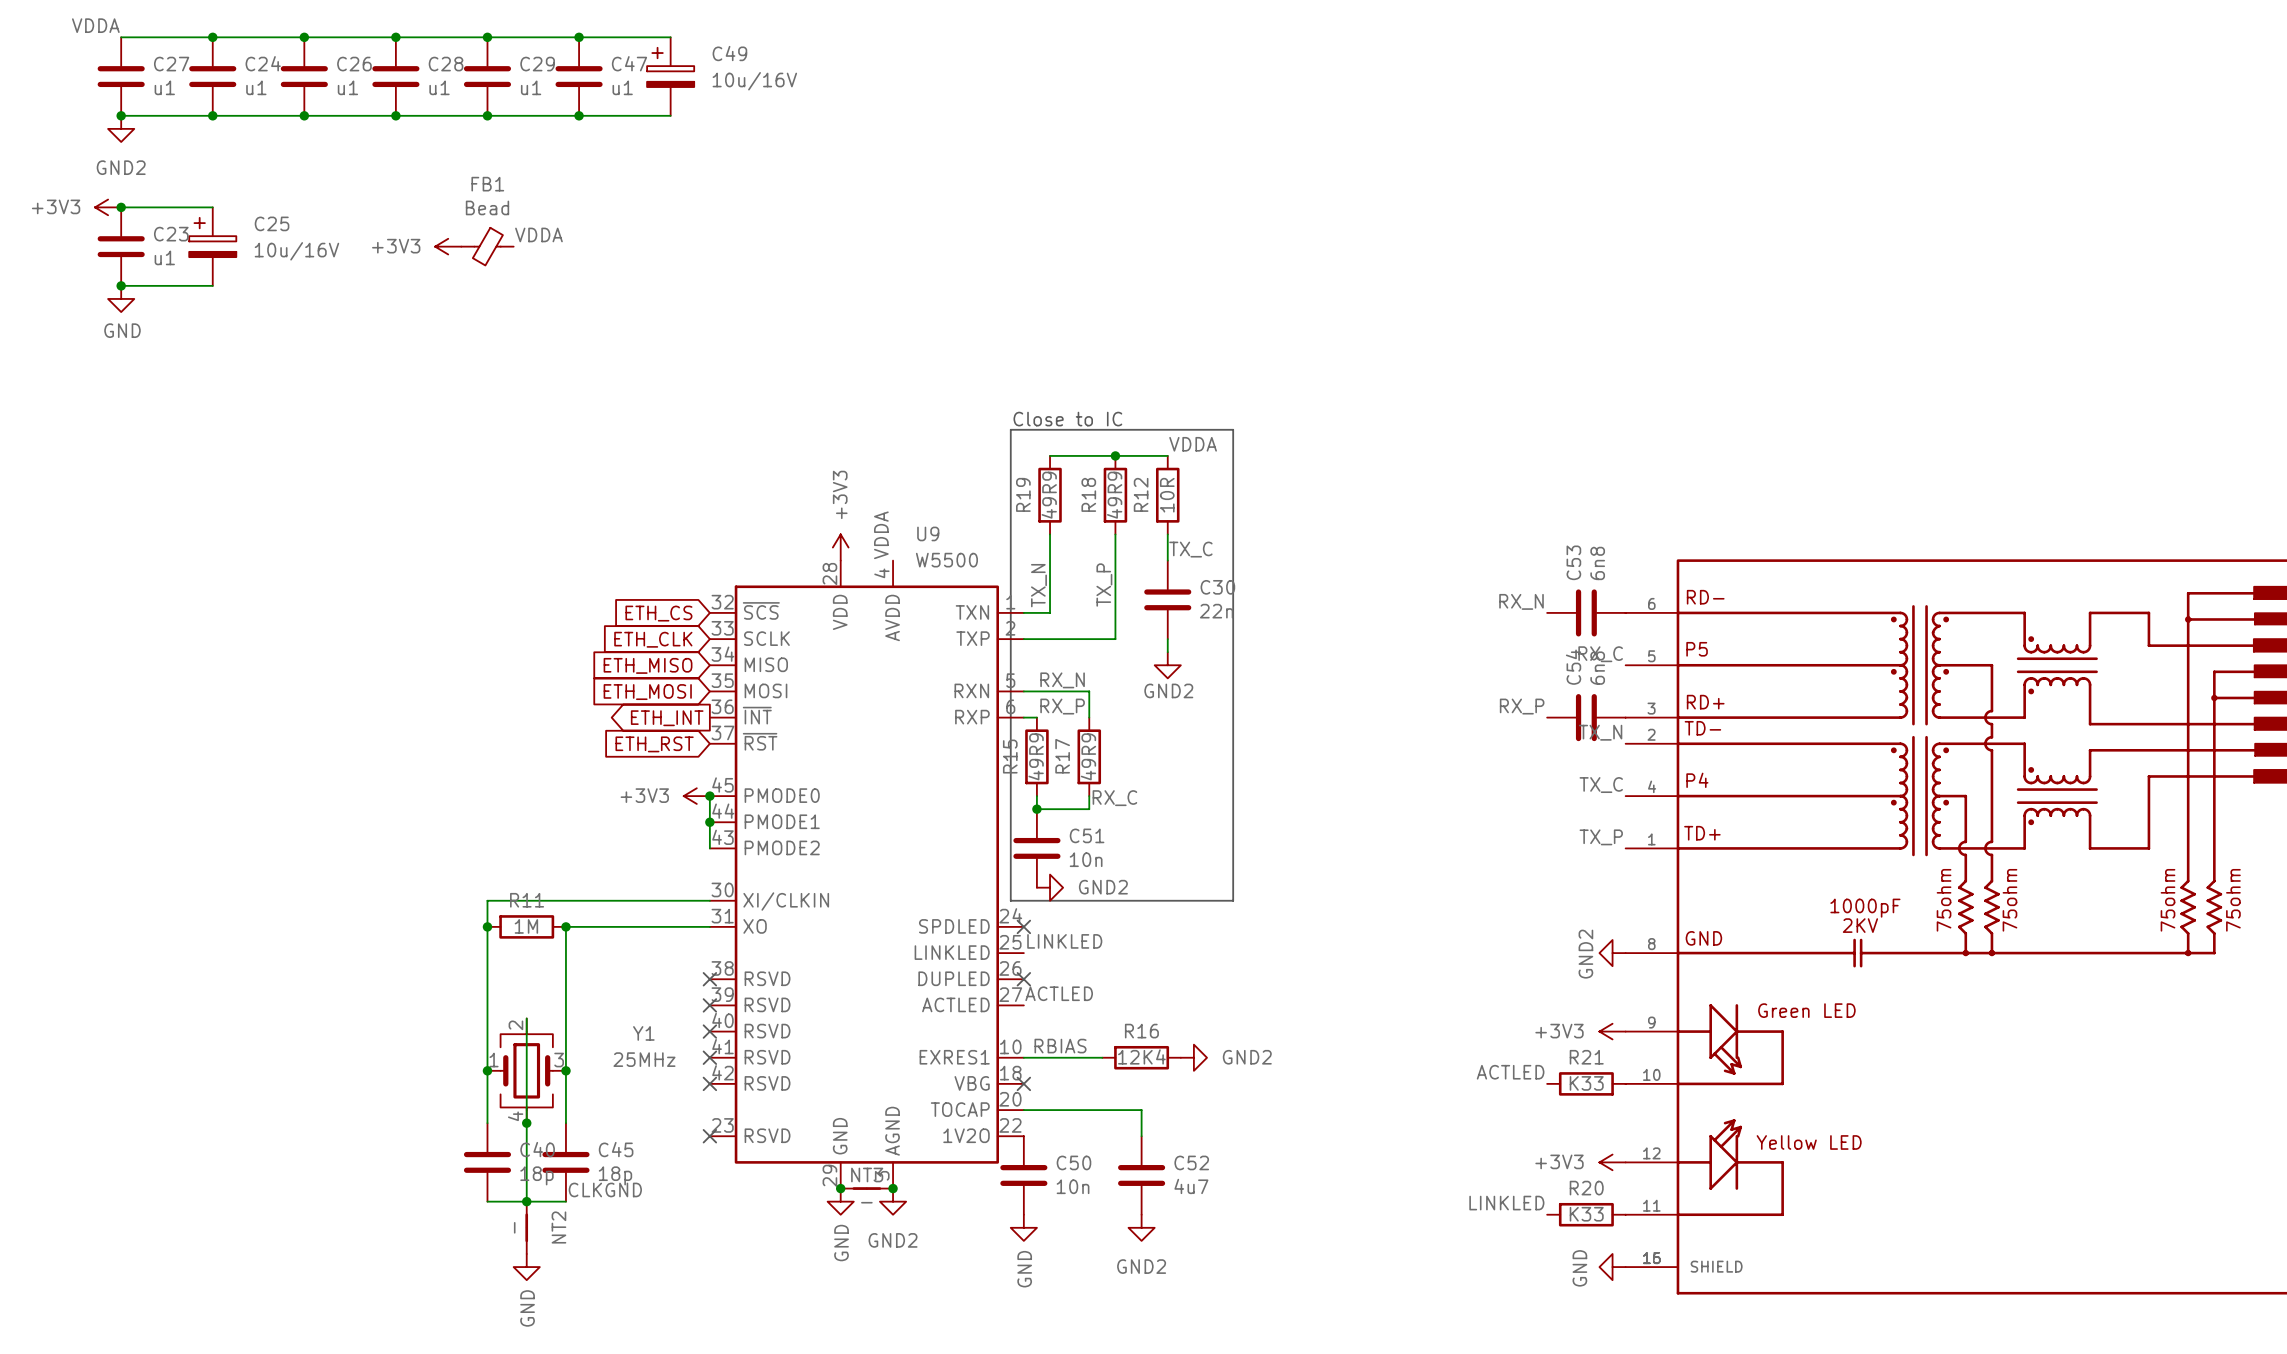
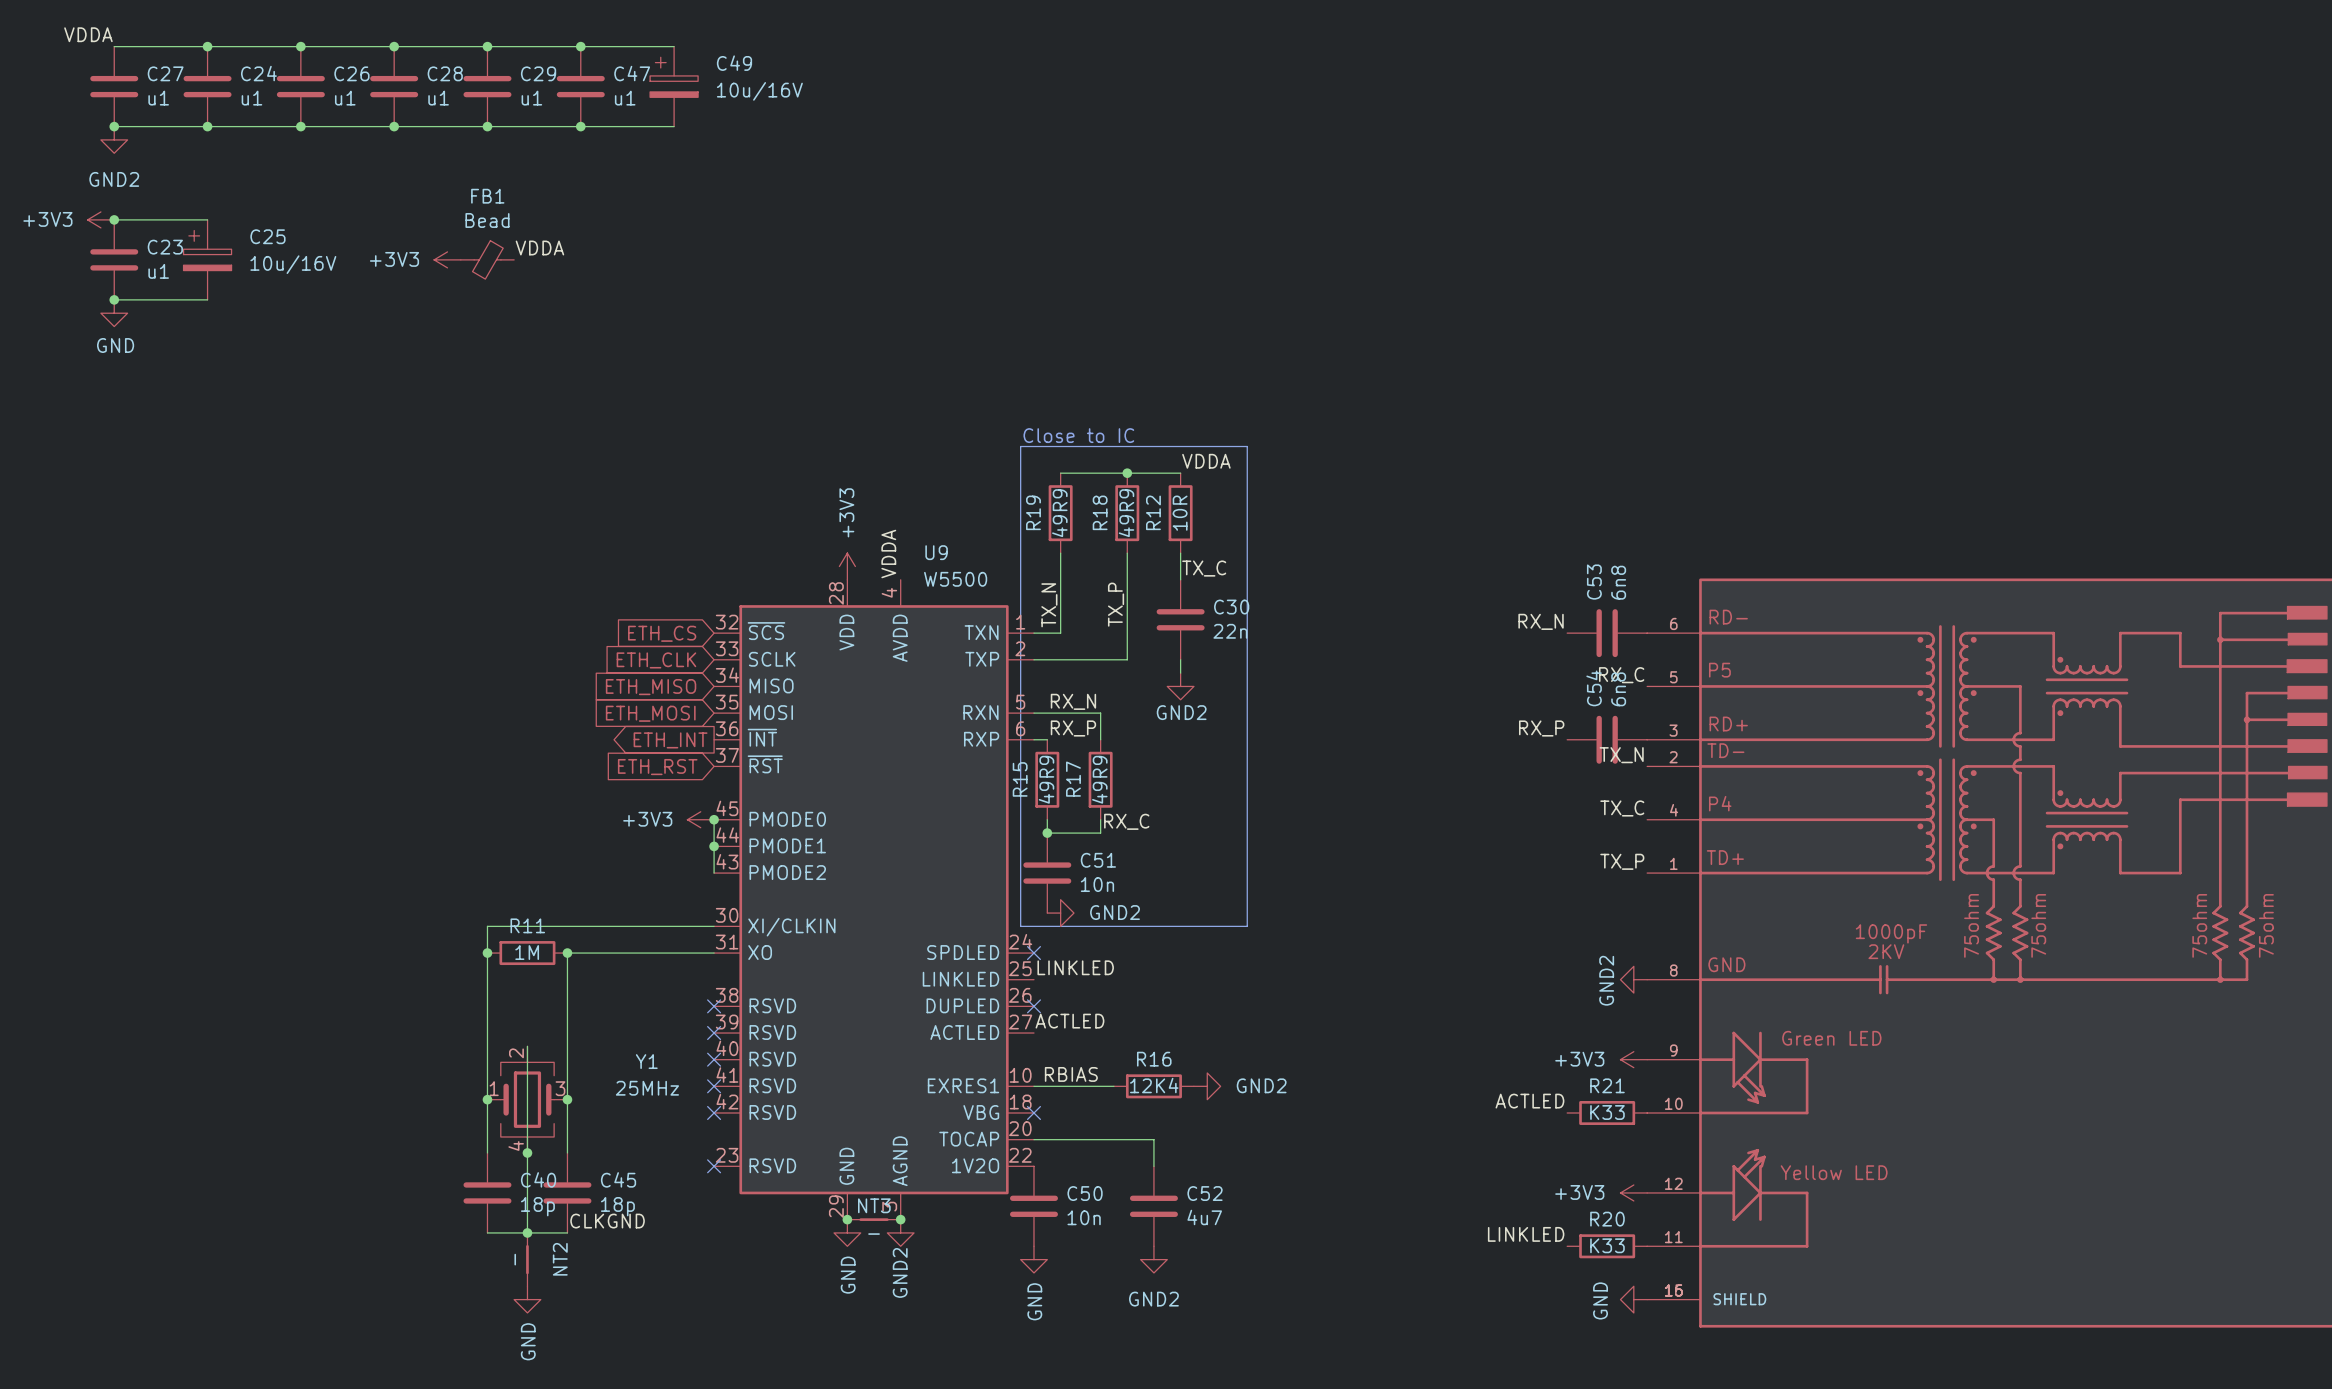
power symbol text rotation: 0° (893, 1240) -> 90° counterclockwise (900, 1272)

